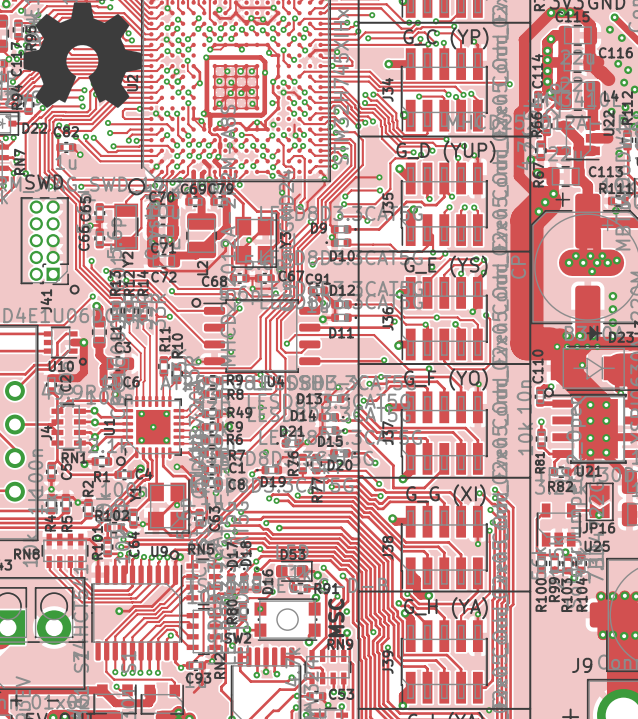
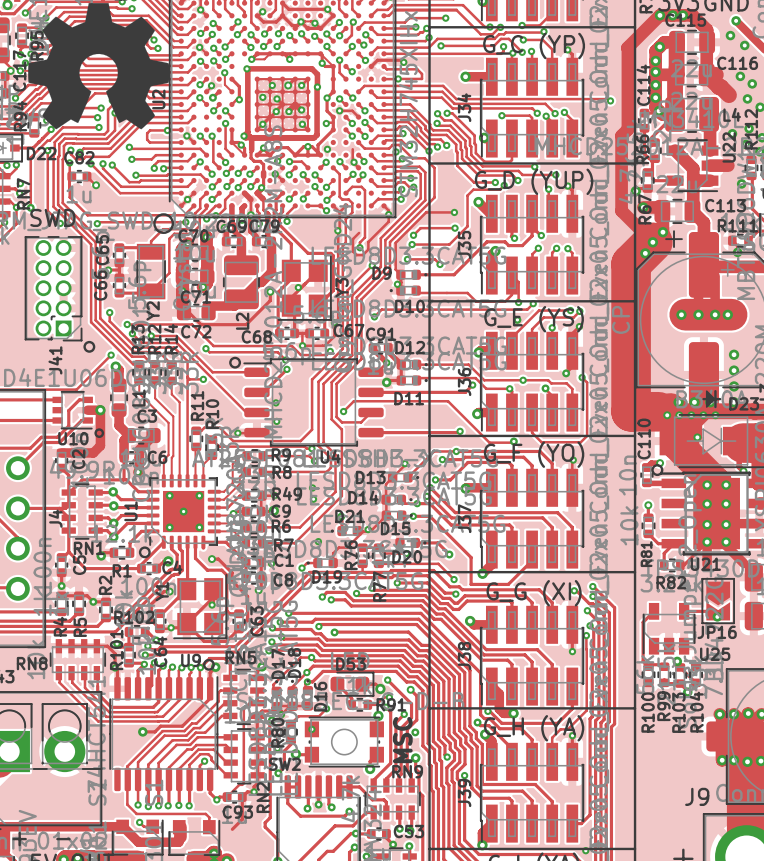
via: (575, 256) -> none
via: (590, 256) -> none
via: (602, 256) -> none
via: (616, 260) -> none
via: (592, 271) -> none

